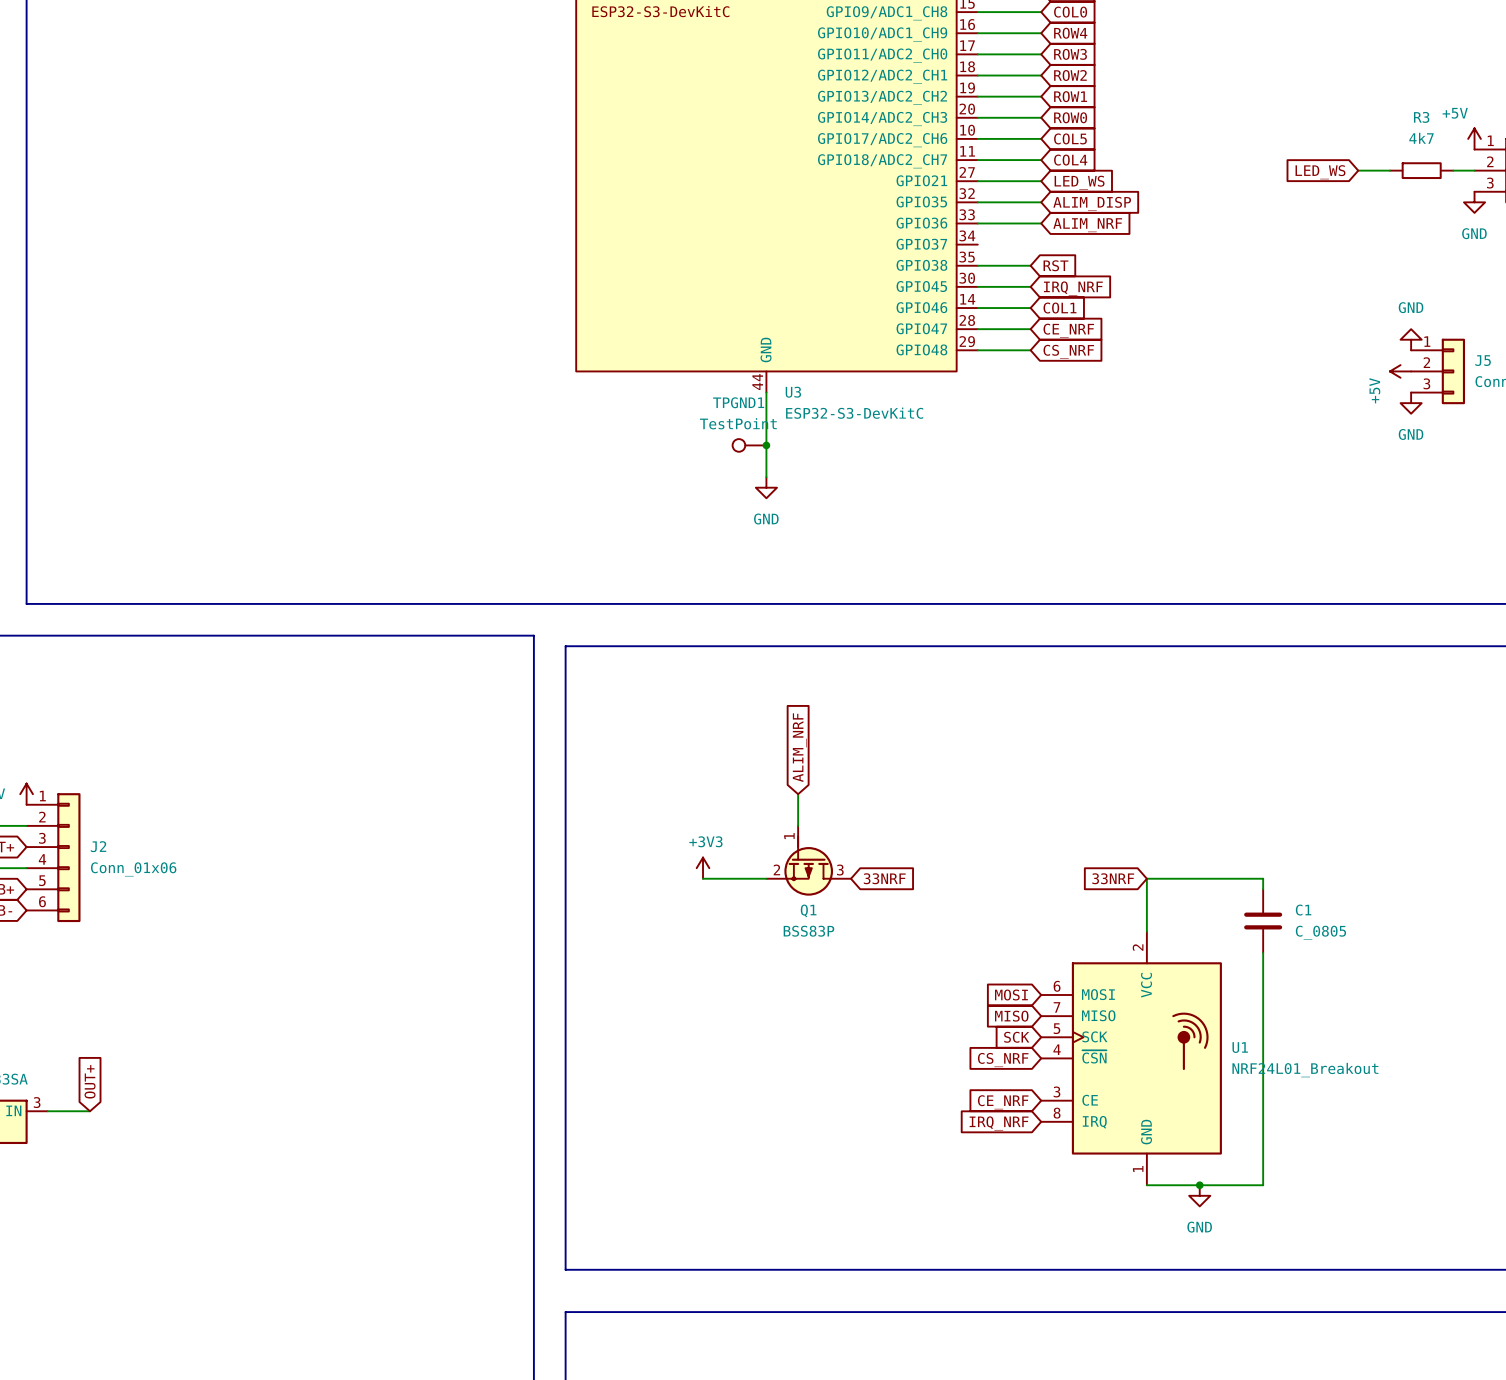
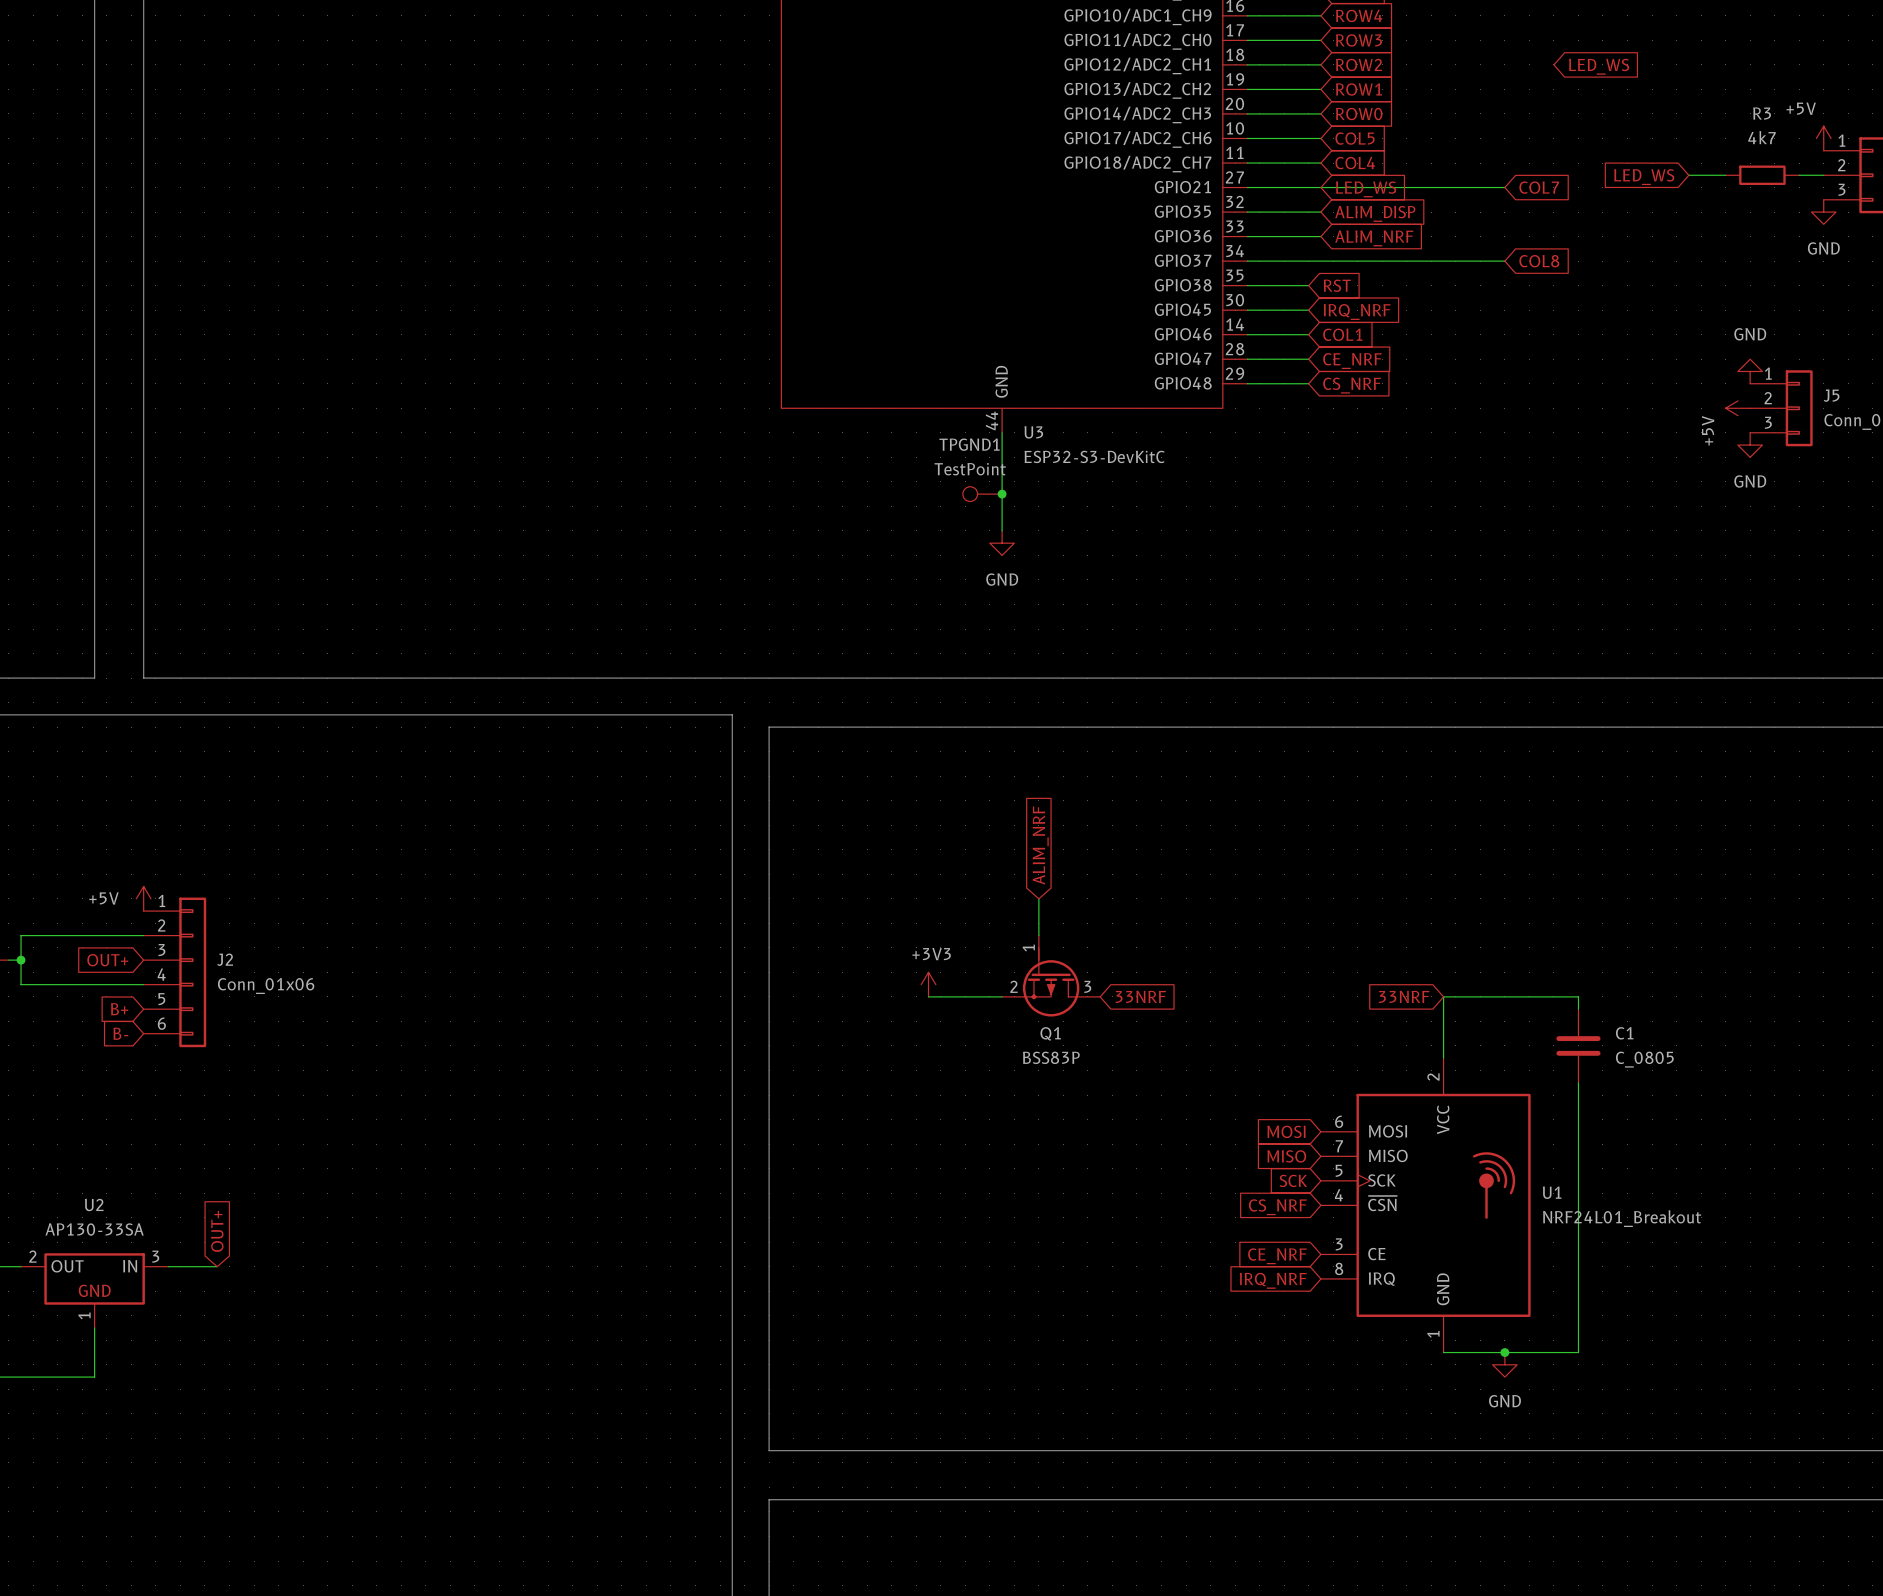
global label: none -> LED_WS (1599, 66)
wire: none -> (1320, 187) (1504, 187)
global label: none -> COL7 (1539, 187)
wire: none -> (1247, 261) (1504, 261)
global label: none -> COL8 (1539, 261)

